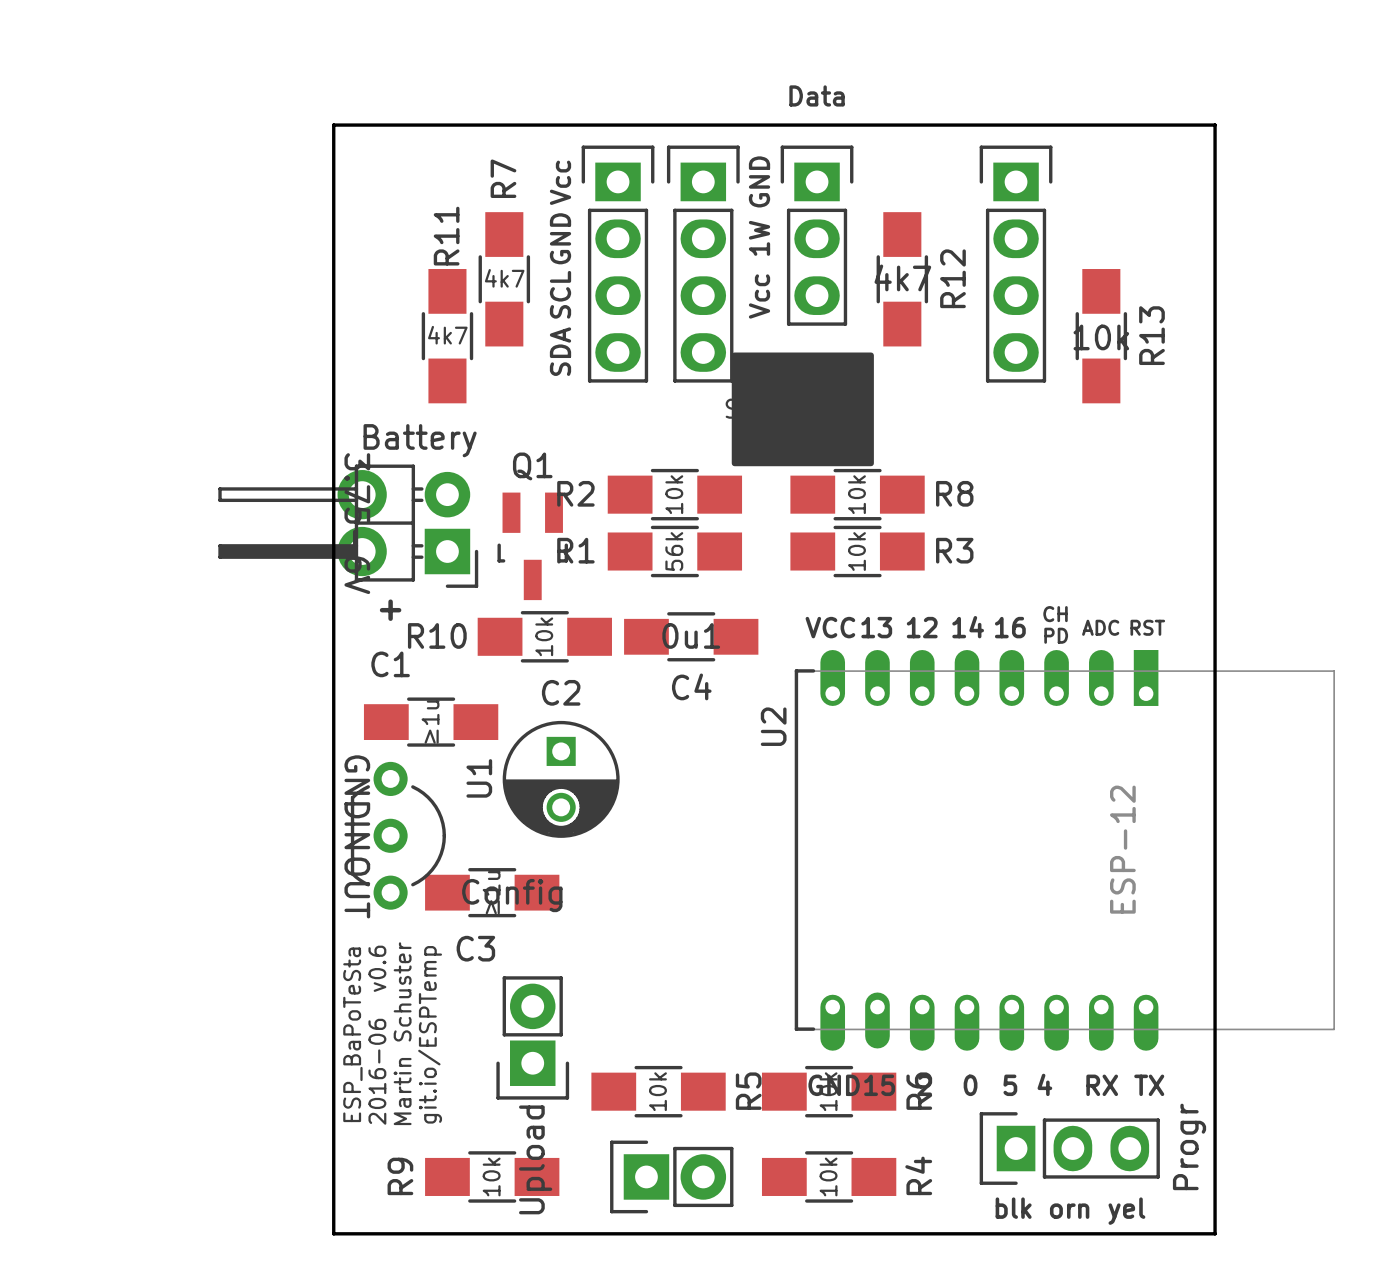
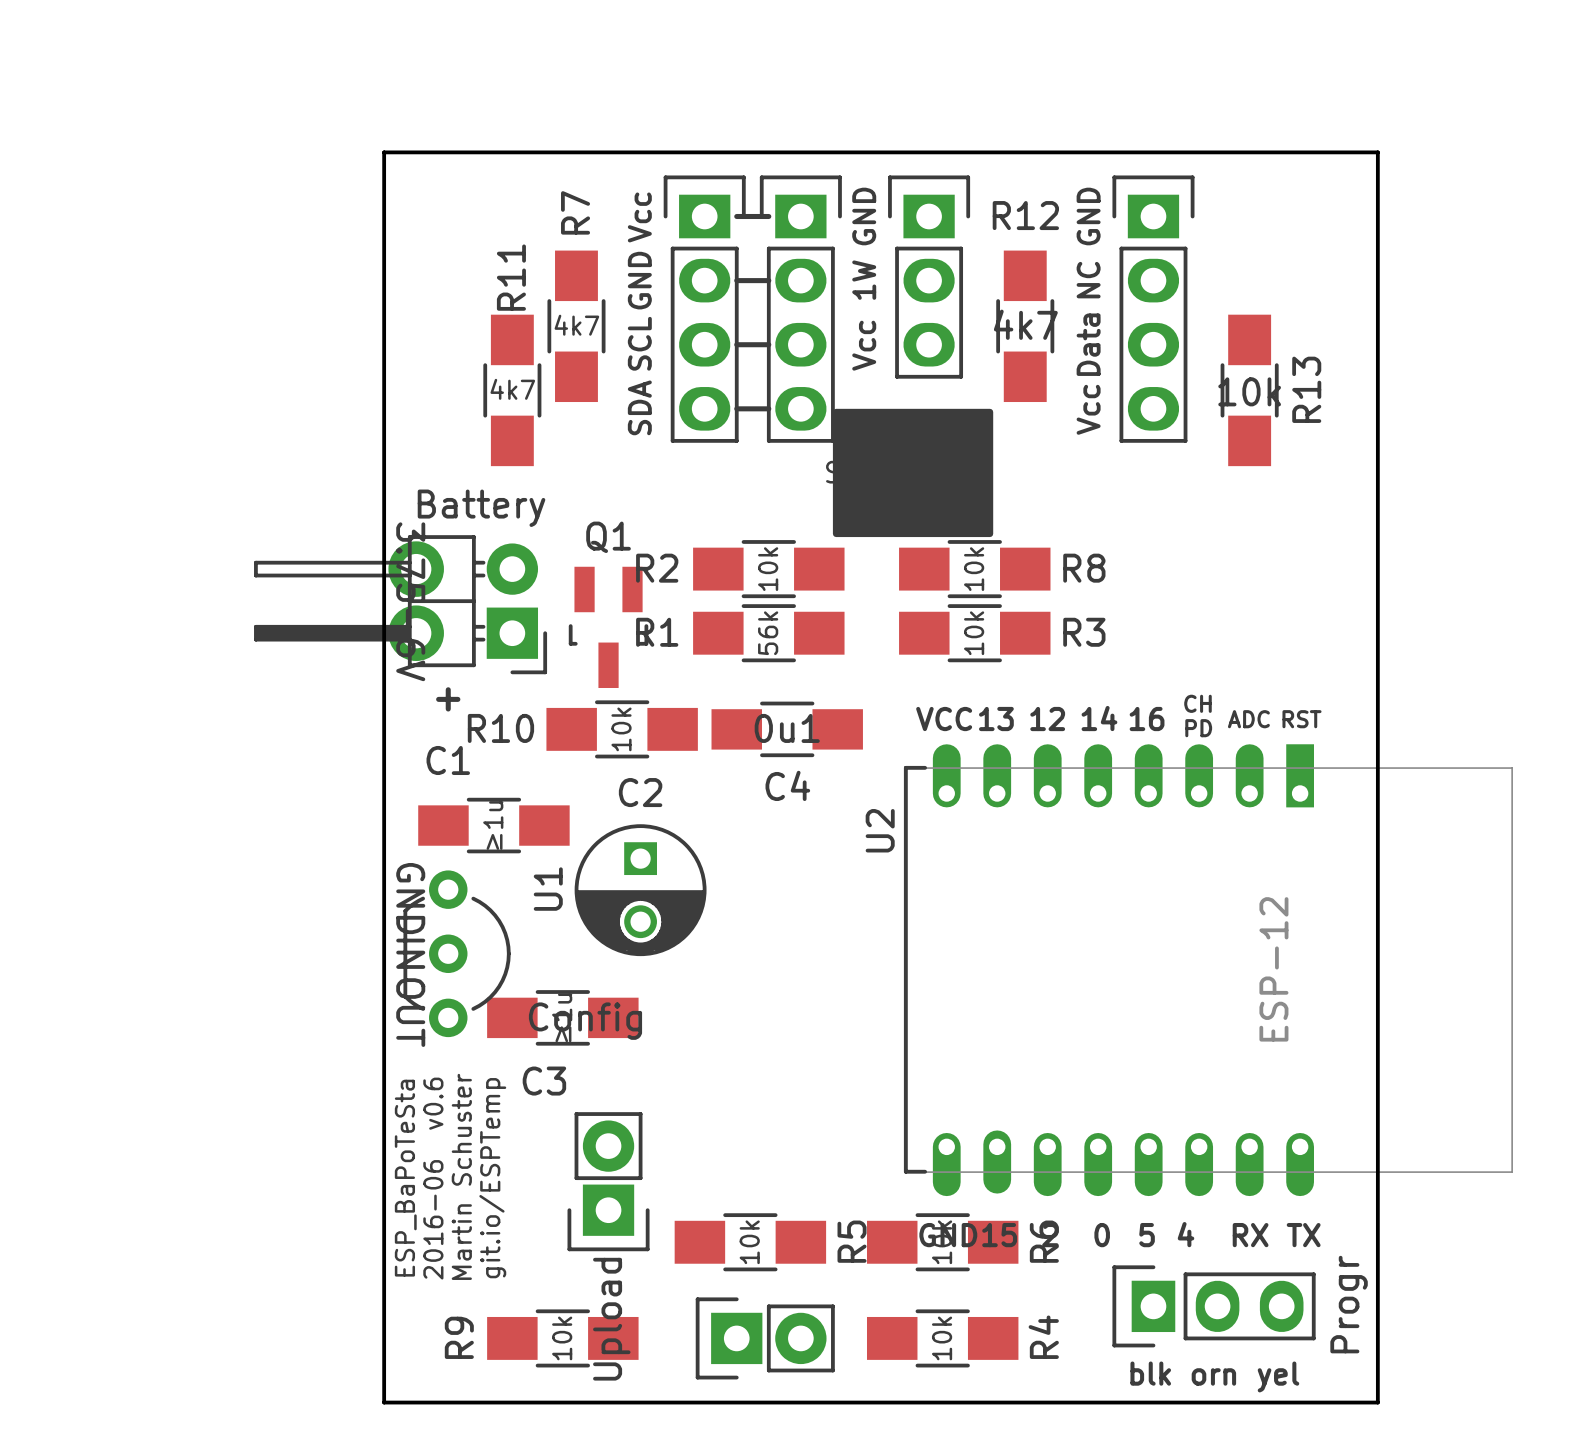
text rotation: 0° (817, 95) -> 90° counterclockwise (1088, 344)
text position: Data (817, 95) -> Data (1088, 344)
line: none -> (736, 216) (768, 216)
text: none -> GND (1088, 216)
line: none -> (736, 280) (768, 280)
text: none -> NC (1088, 280)
R12 name rotation: 0° (952, 278) -> 90° clockwise (1025, 215)
R12 name position: R12 (952, 278) -> R12 (1025, 215)
line: none -> (736, 344) (768, 344)
line: none -> (736, 408) (768, 408)
text: none -> Vcc (1088, 409)

